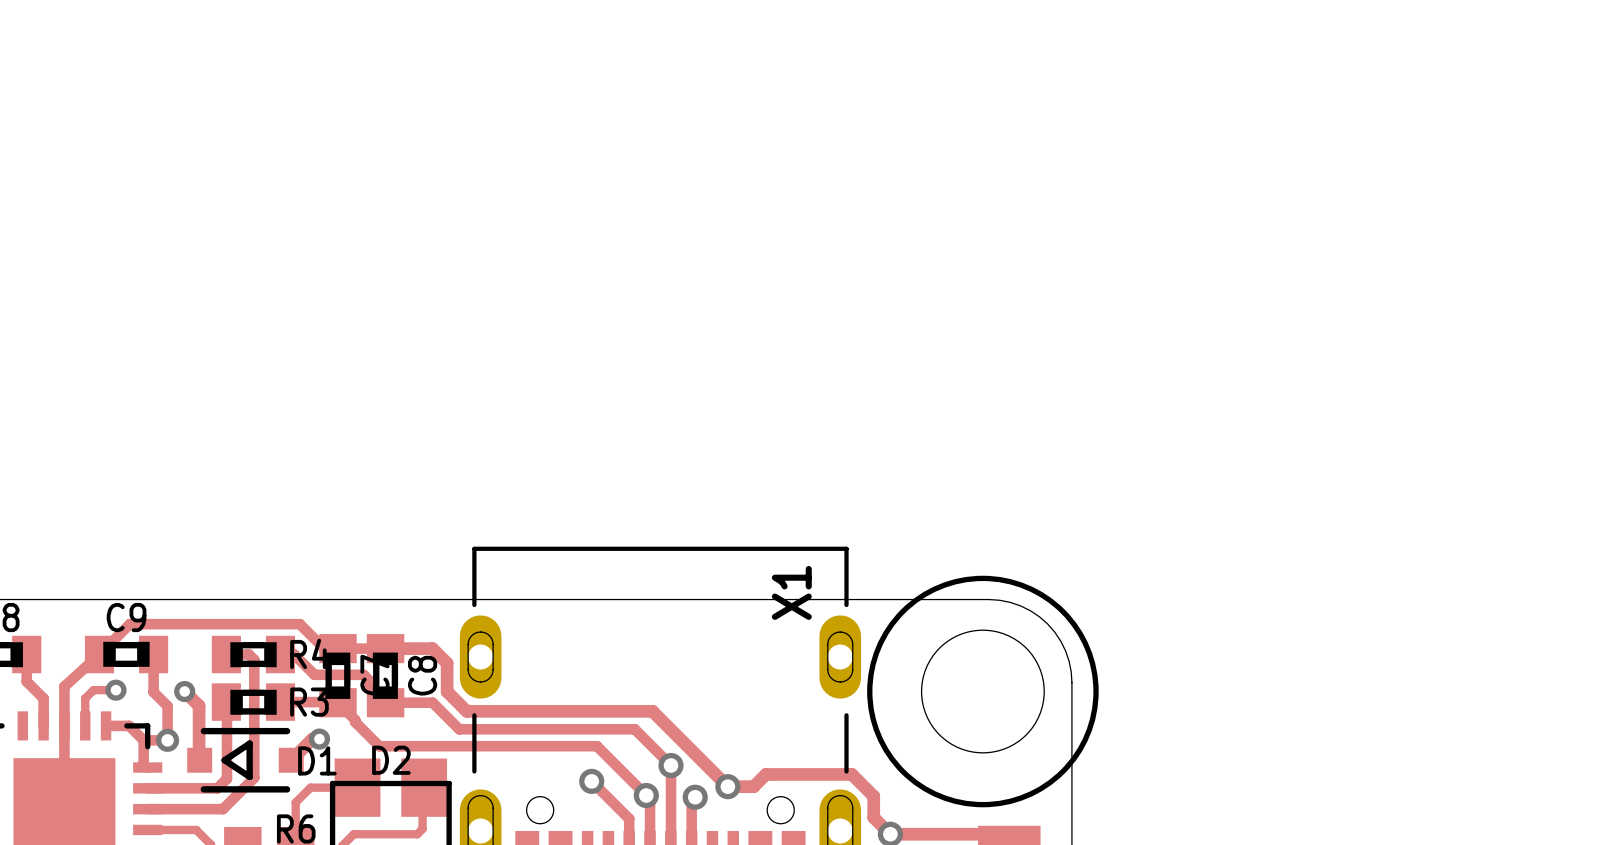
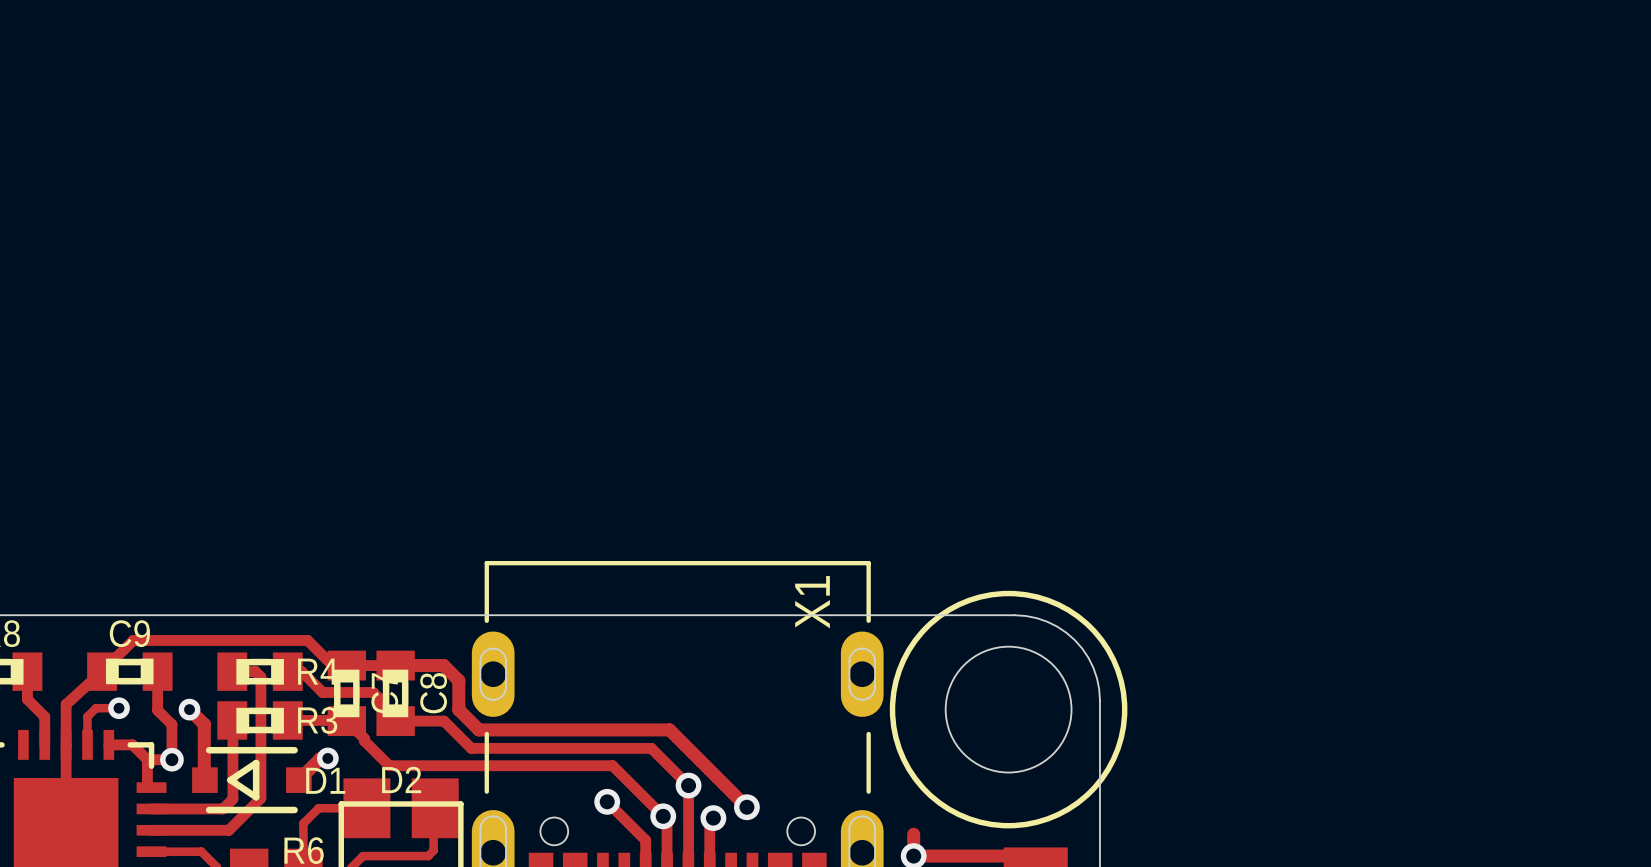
track: (727, 786) (753, 786) (765, 774) (851, 774) (873, 796) (873, 817) (890, 834) -> (913, 834) (913, 856)

